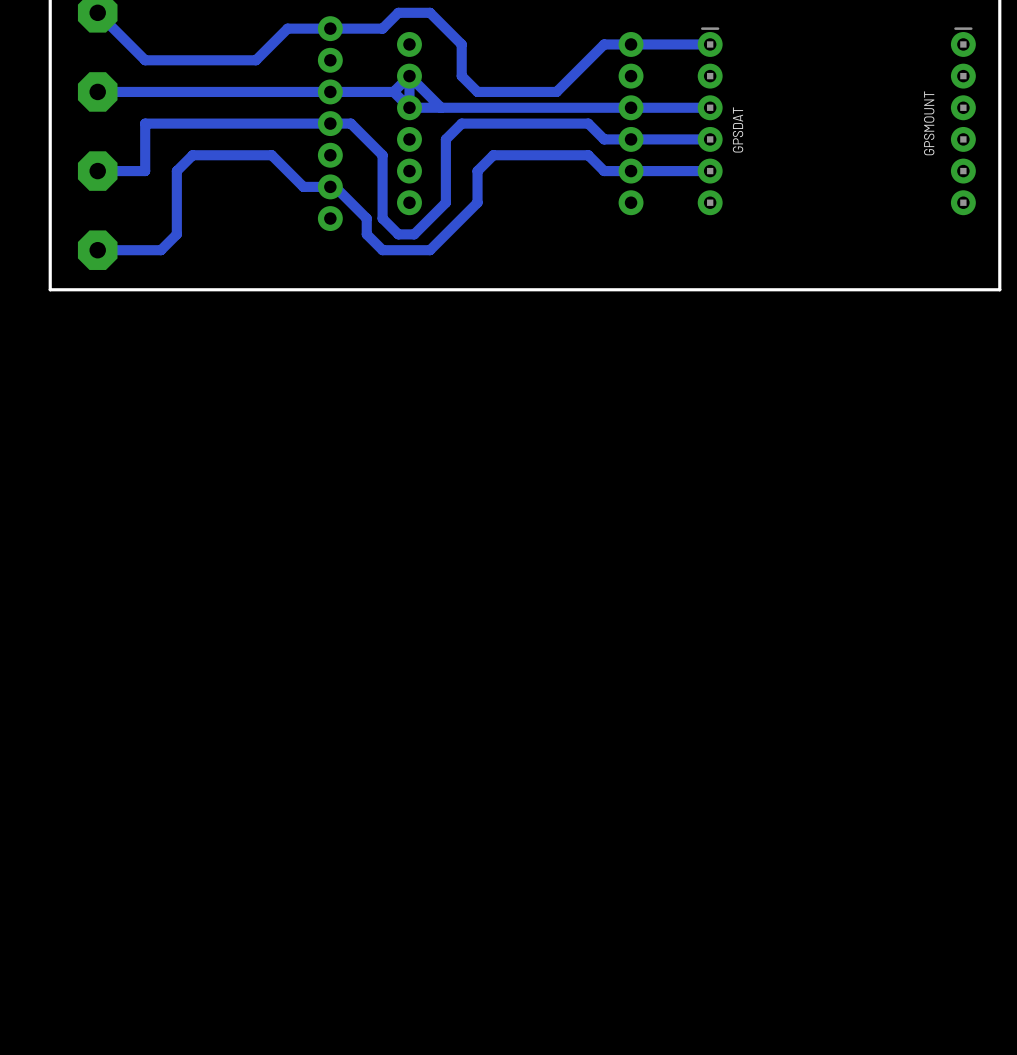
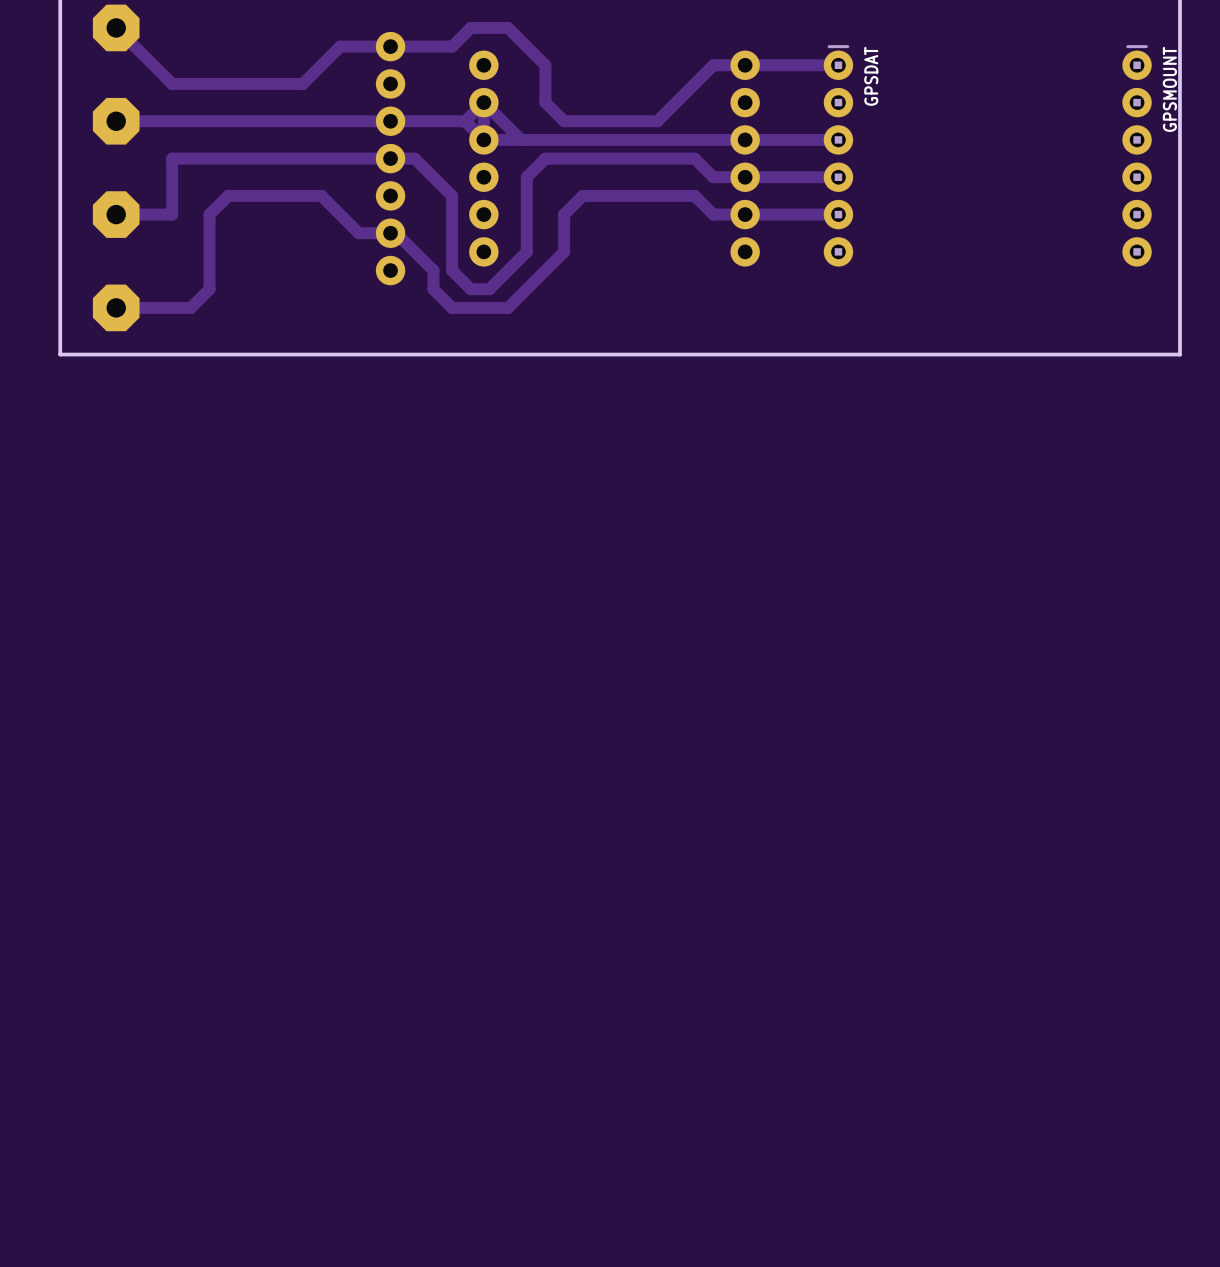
GPSMOUNT name position: GPSMOUNT (929, 123) -> GPSMOUNT (1169, 89)
GPSDAT name position: GPSDAT (738, 129) -> GPSDAT (871, 76)

